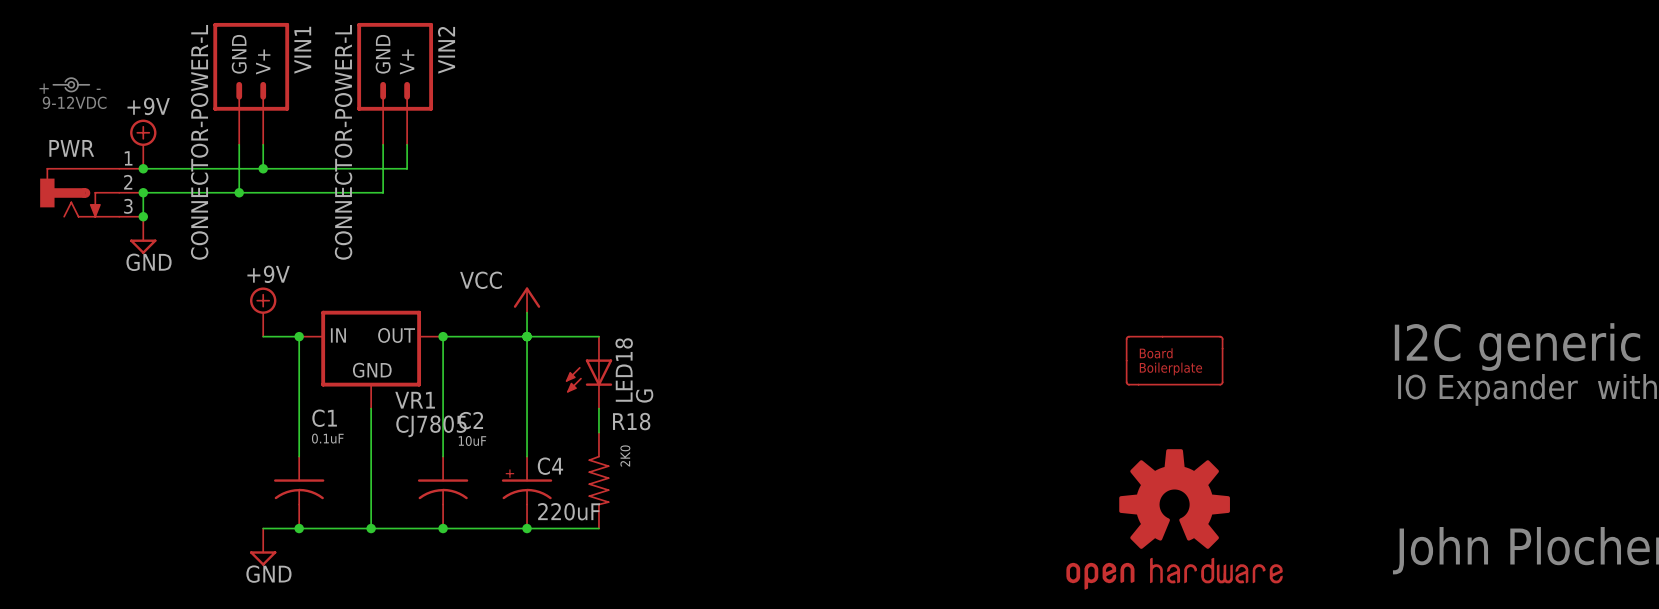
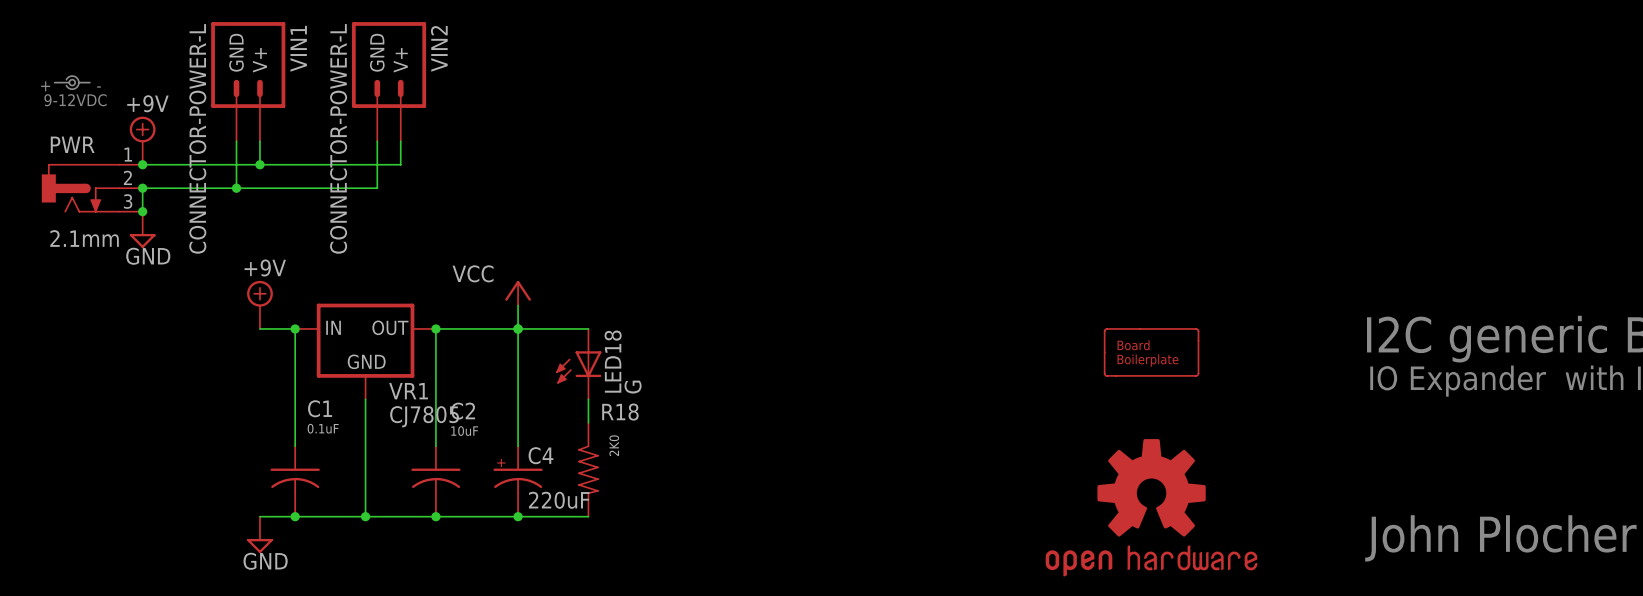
PWR value: none -> 2.1mm (84, 238)

